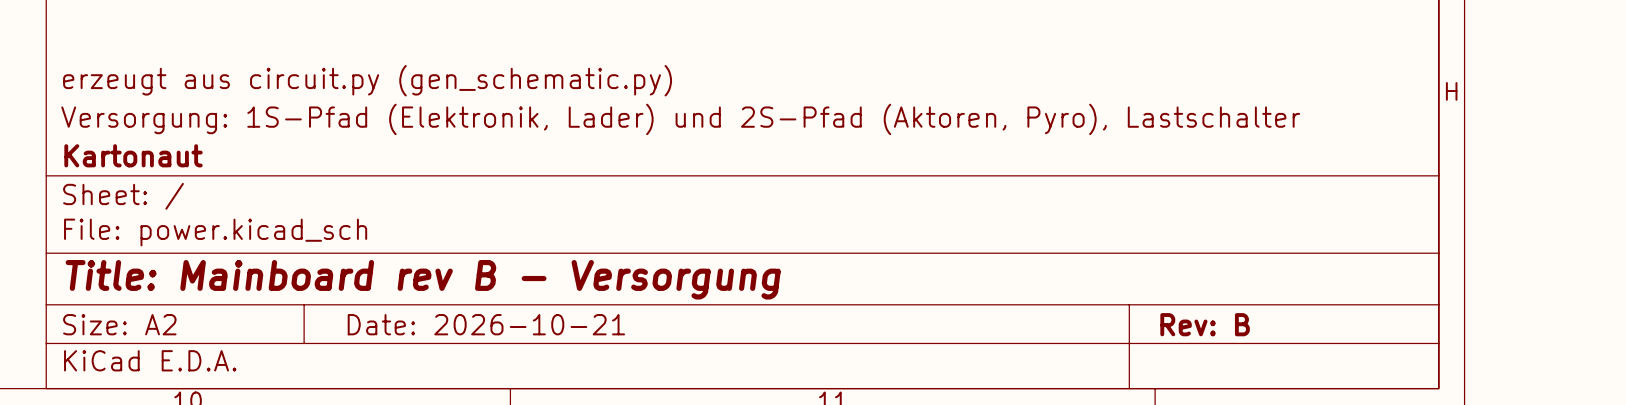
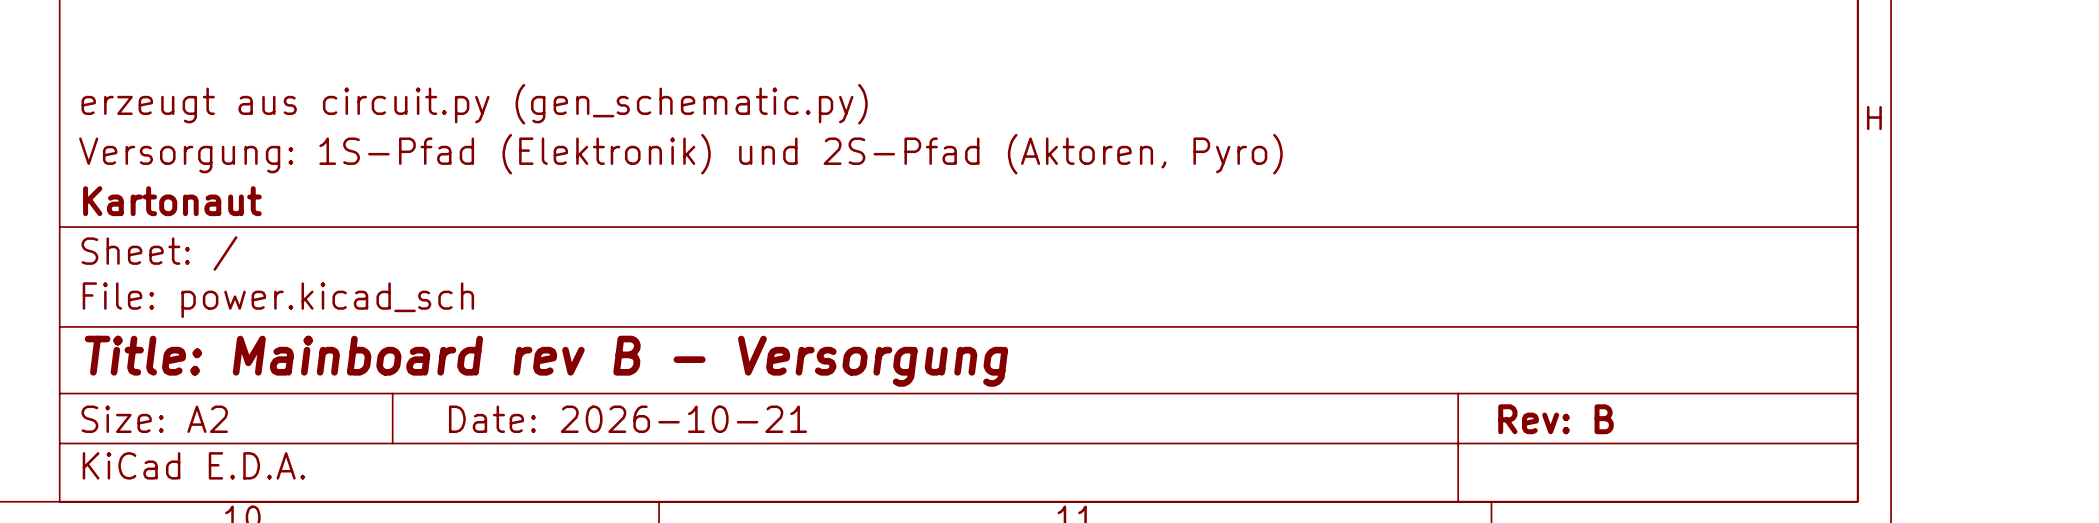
title block: Versorgung: 1S-Pfad (Elektronik, Lader) und 2S-Pfad (Aktoren, Pyro), Lastschalter (680, 119) -> Versorgung: 1S-Pfad (Elektronik) und 2S-Pfad (Aktoren, Pyro) (680, 154)

